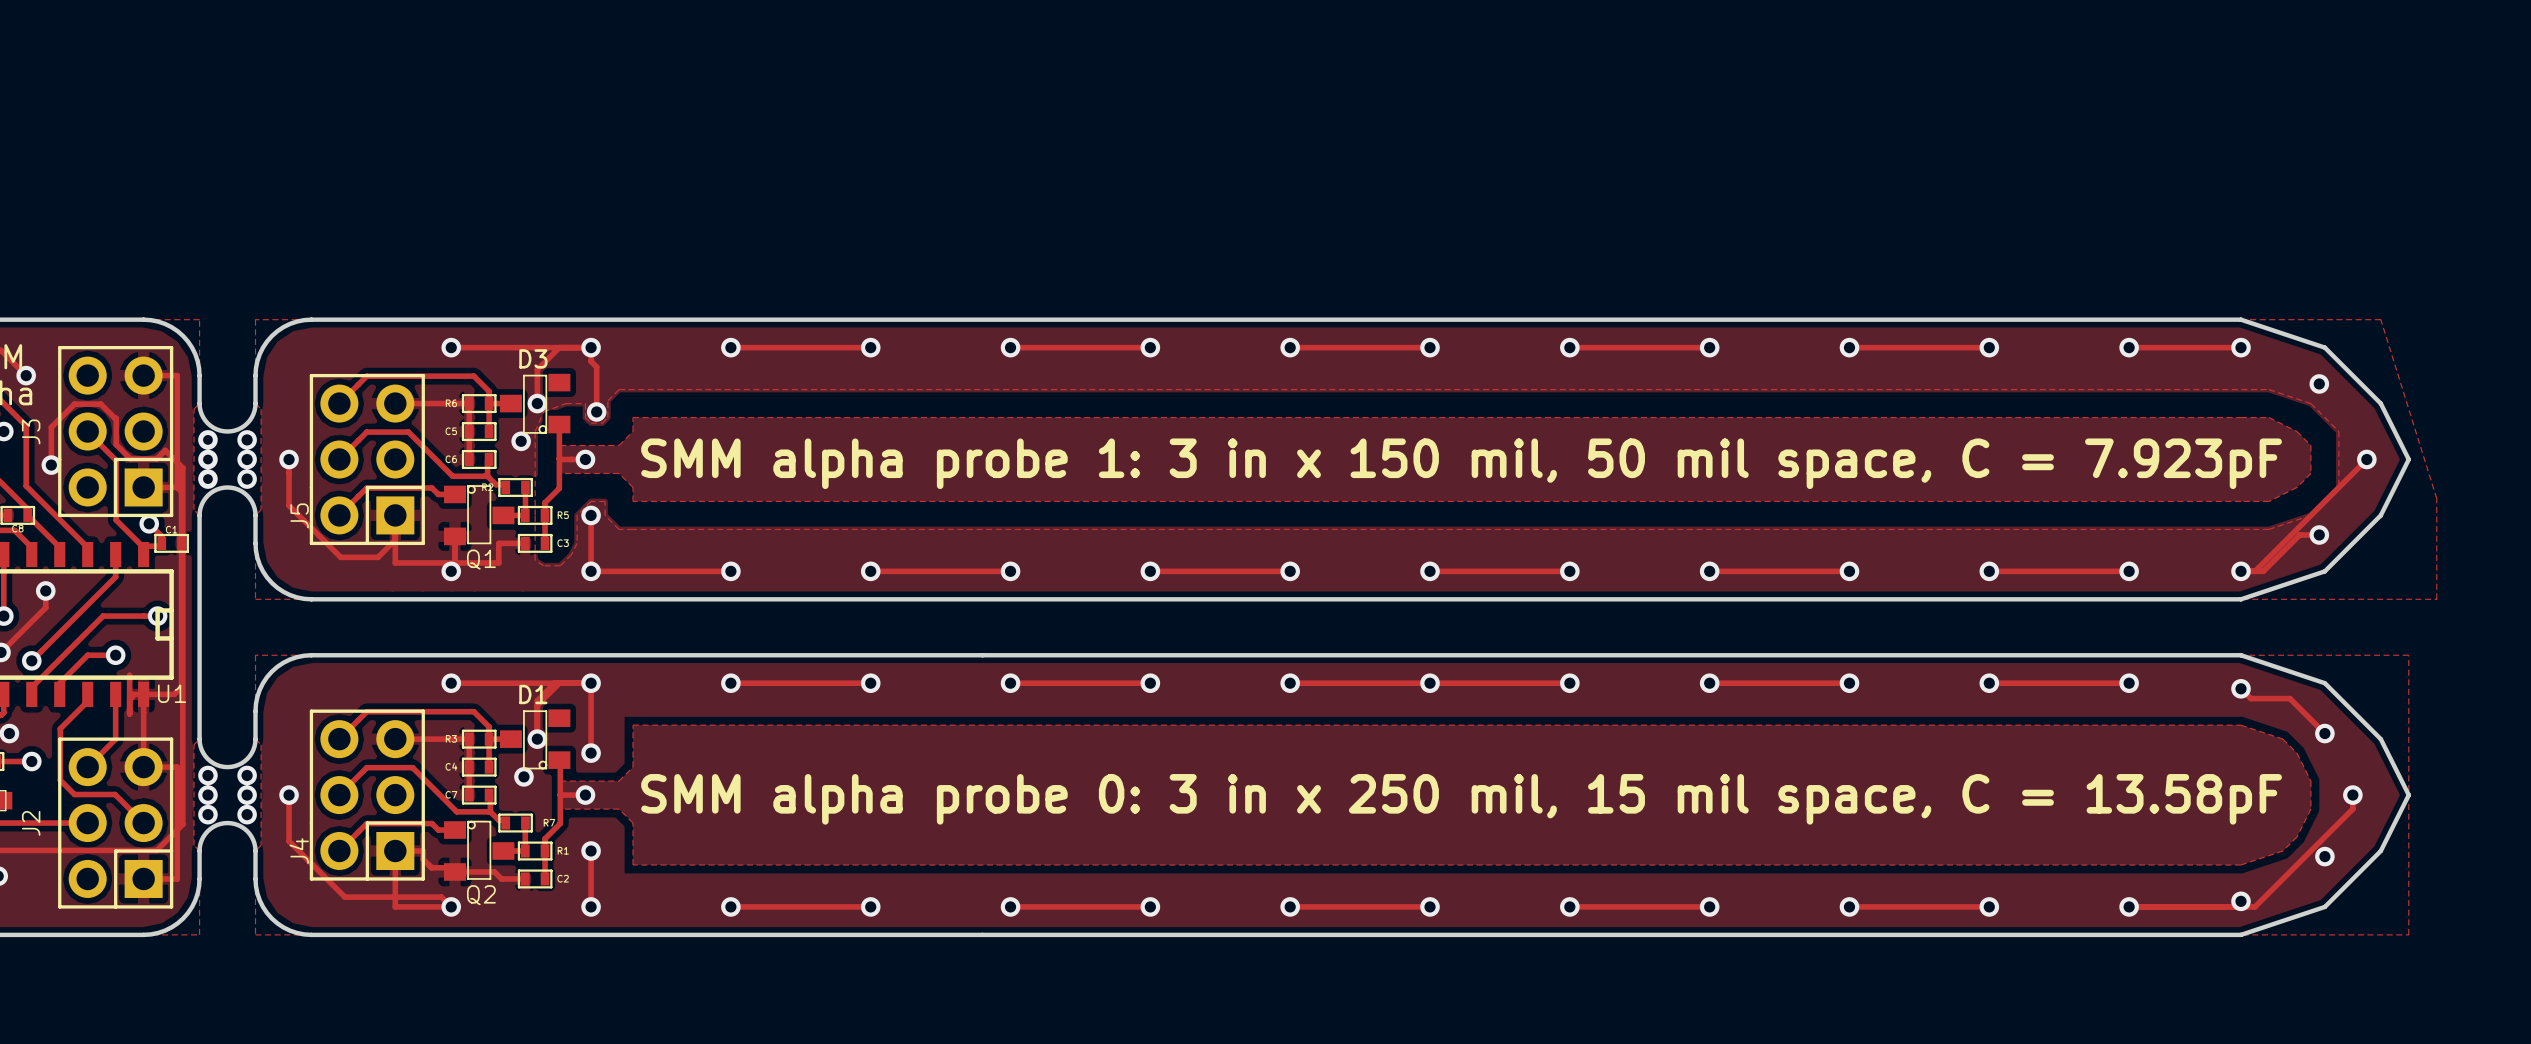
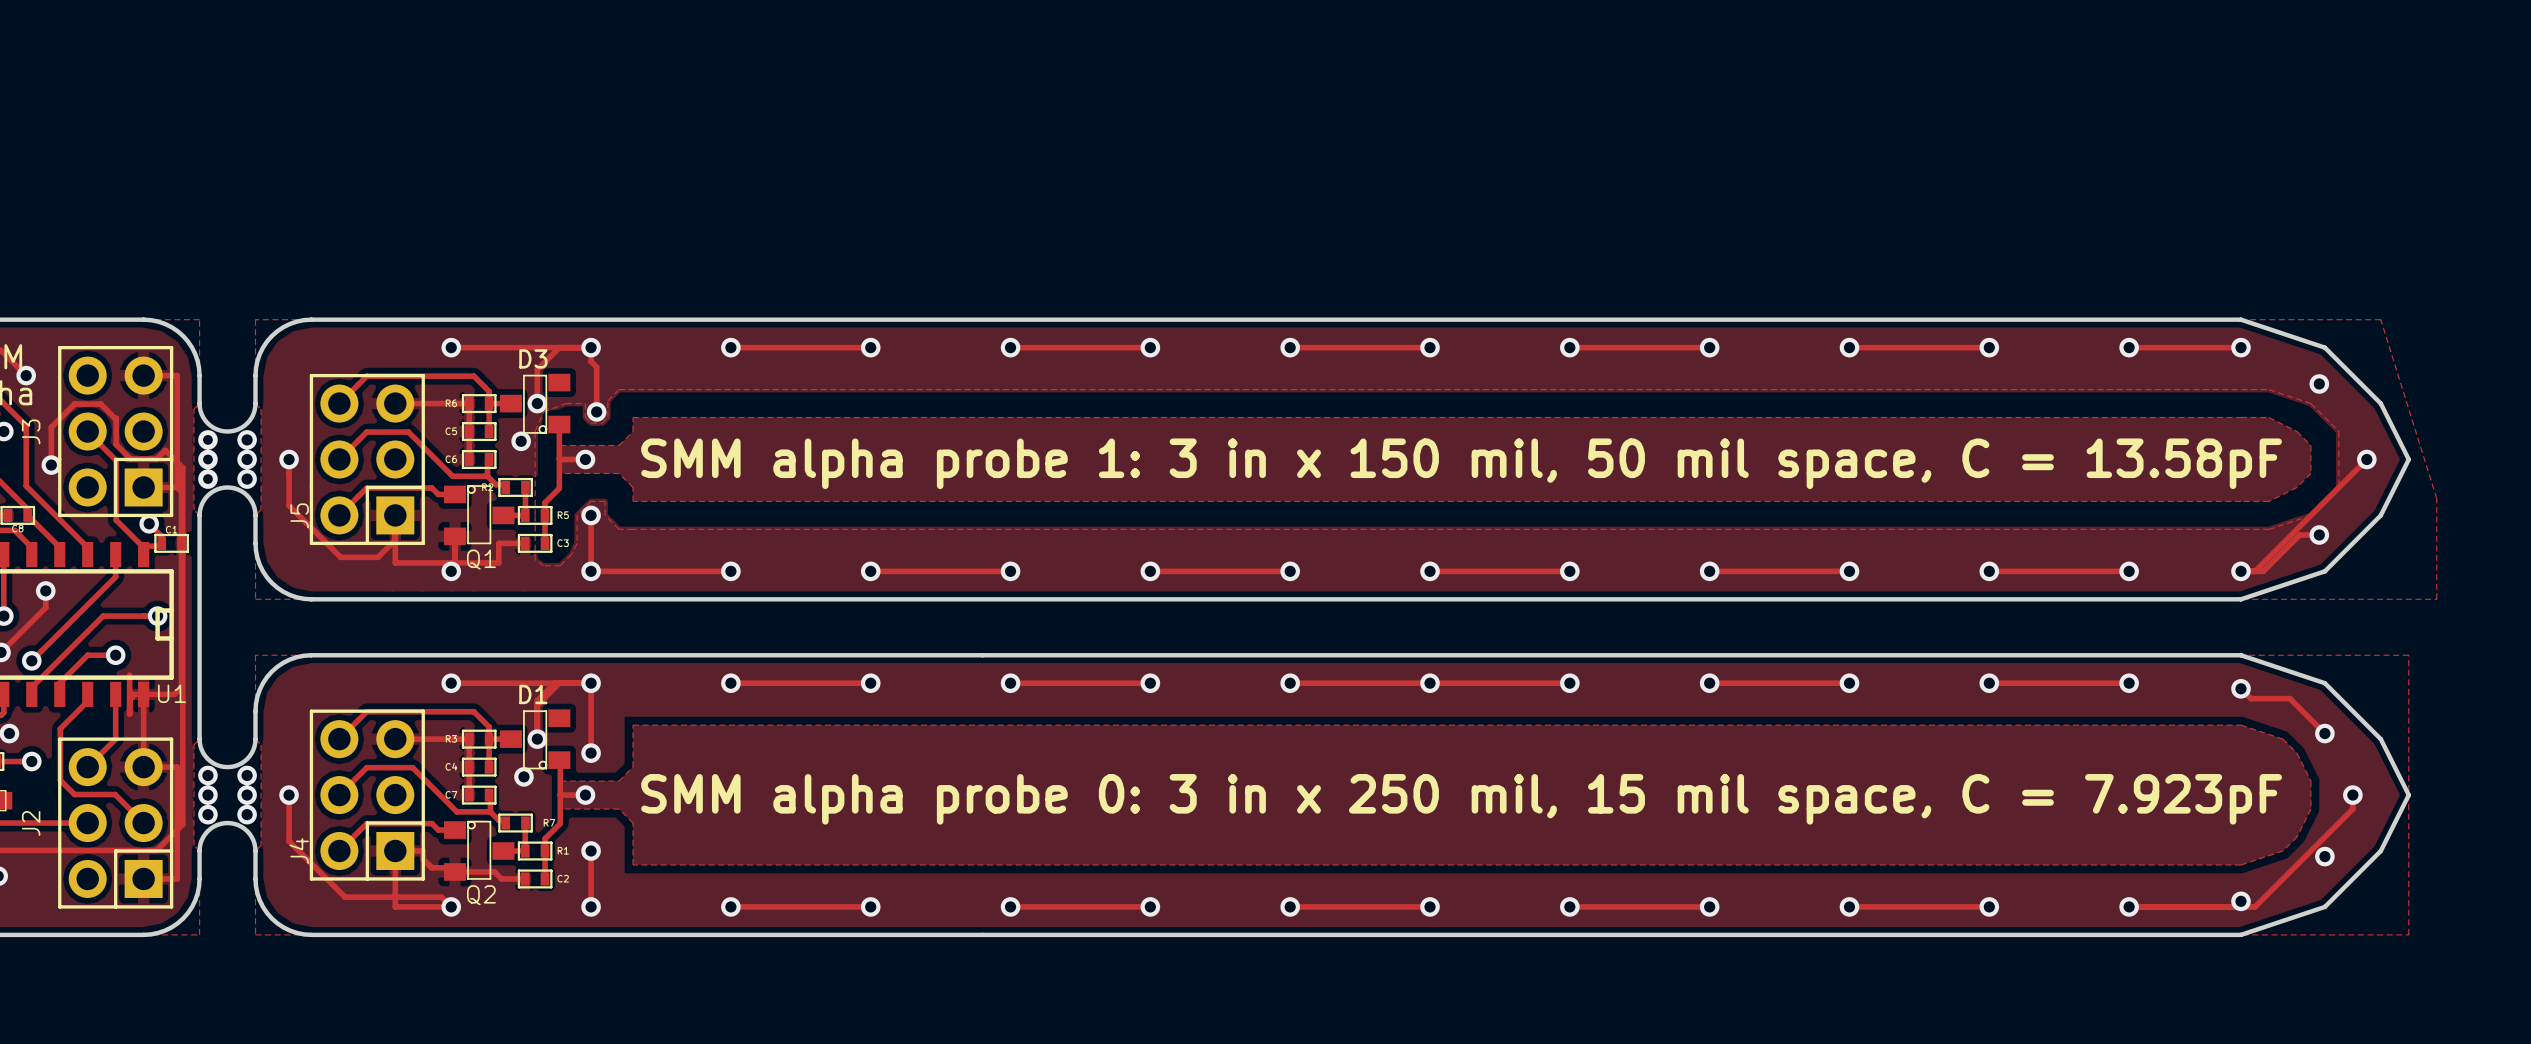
text: SMM alpha probe 1: 3 in x 150 mil, 50 mil space, C = 7.923pF (1461, 463) -> SMM alpha probe 1: 3 in x 150 mil, 50 mil space, C = 13.58pF (1461, 463)
text: SMM alpha probe 0: 3 in x 250 mil, 15 mil space, C = 13.58pF (1461, 799) -> SMM alpha probe 0: 3 in x 250 mil, 15 mil space, C = 7.923pF (1461, 799)

